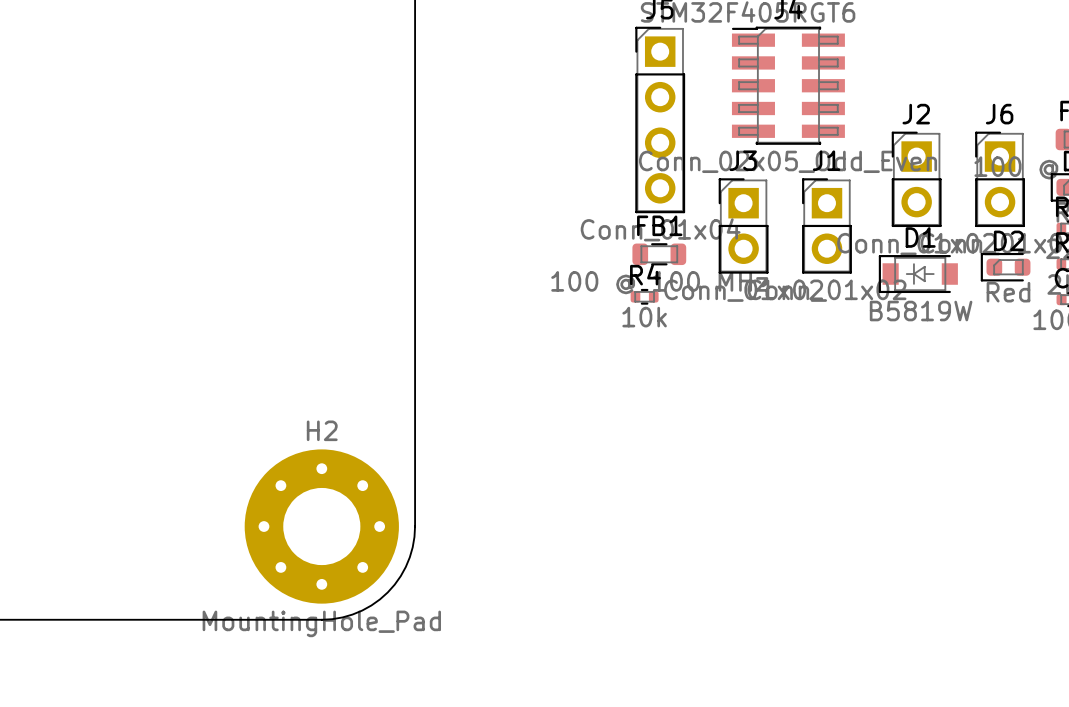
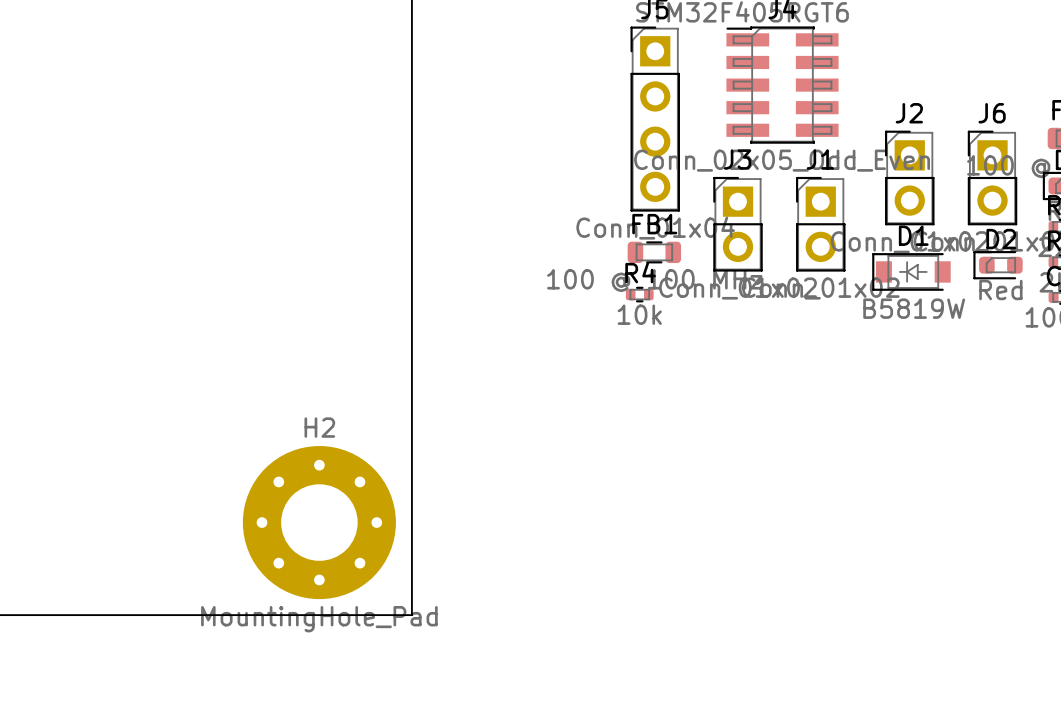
board edge: (415, 526) (409, 557) (400, 576) (387, 592) (362, 610) (342, 617) (321, 619) -> (411, 522) (411, 615) (319, 615)

